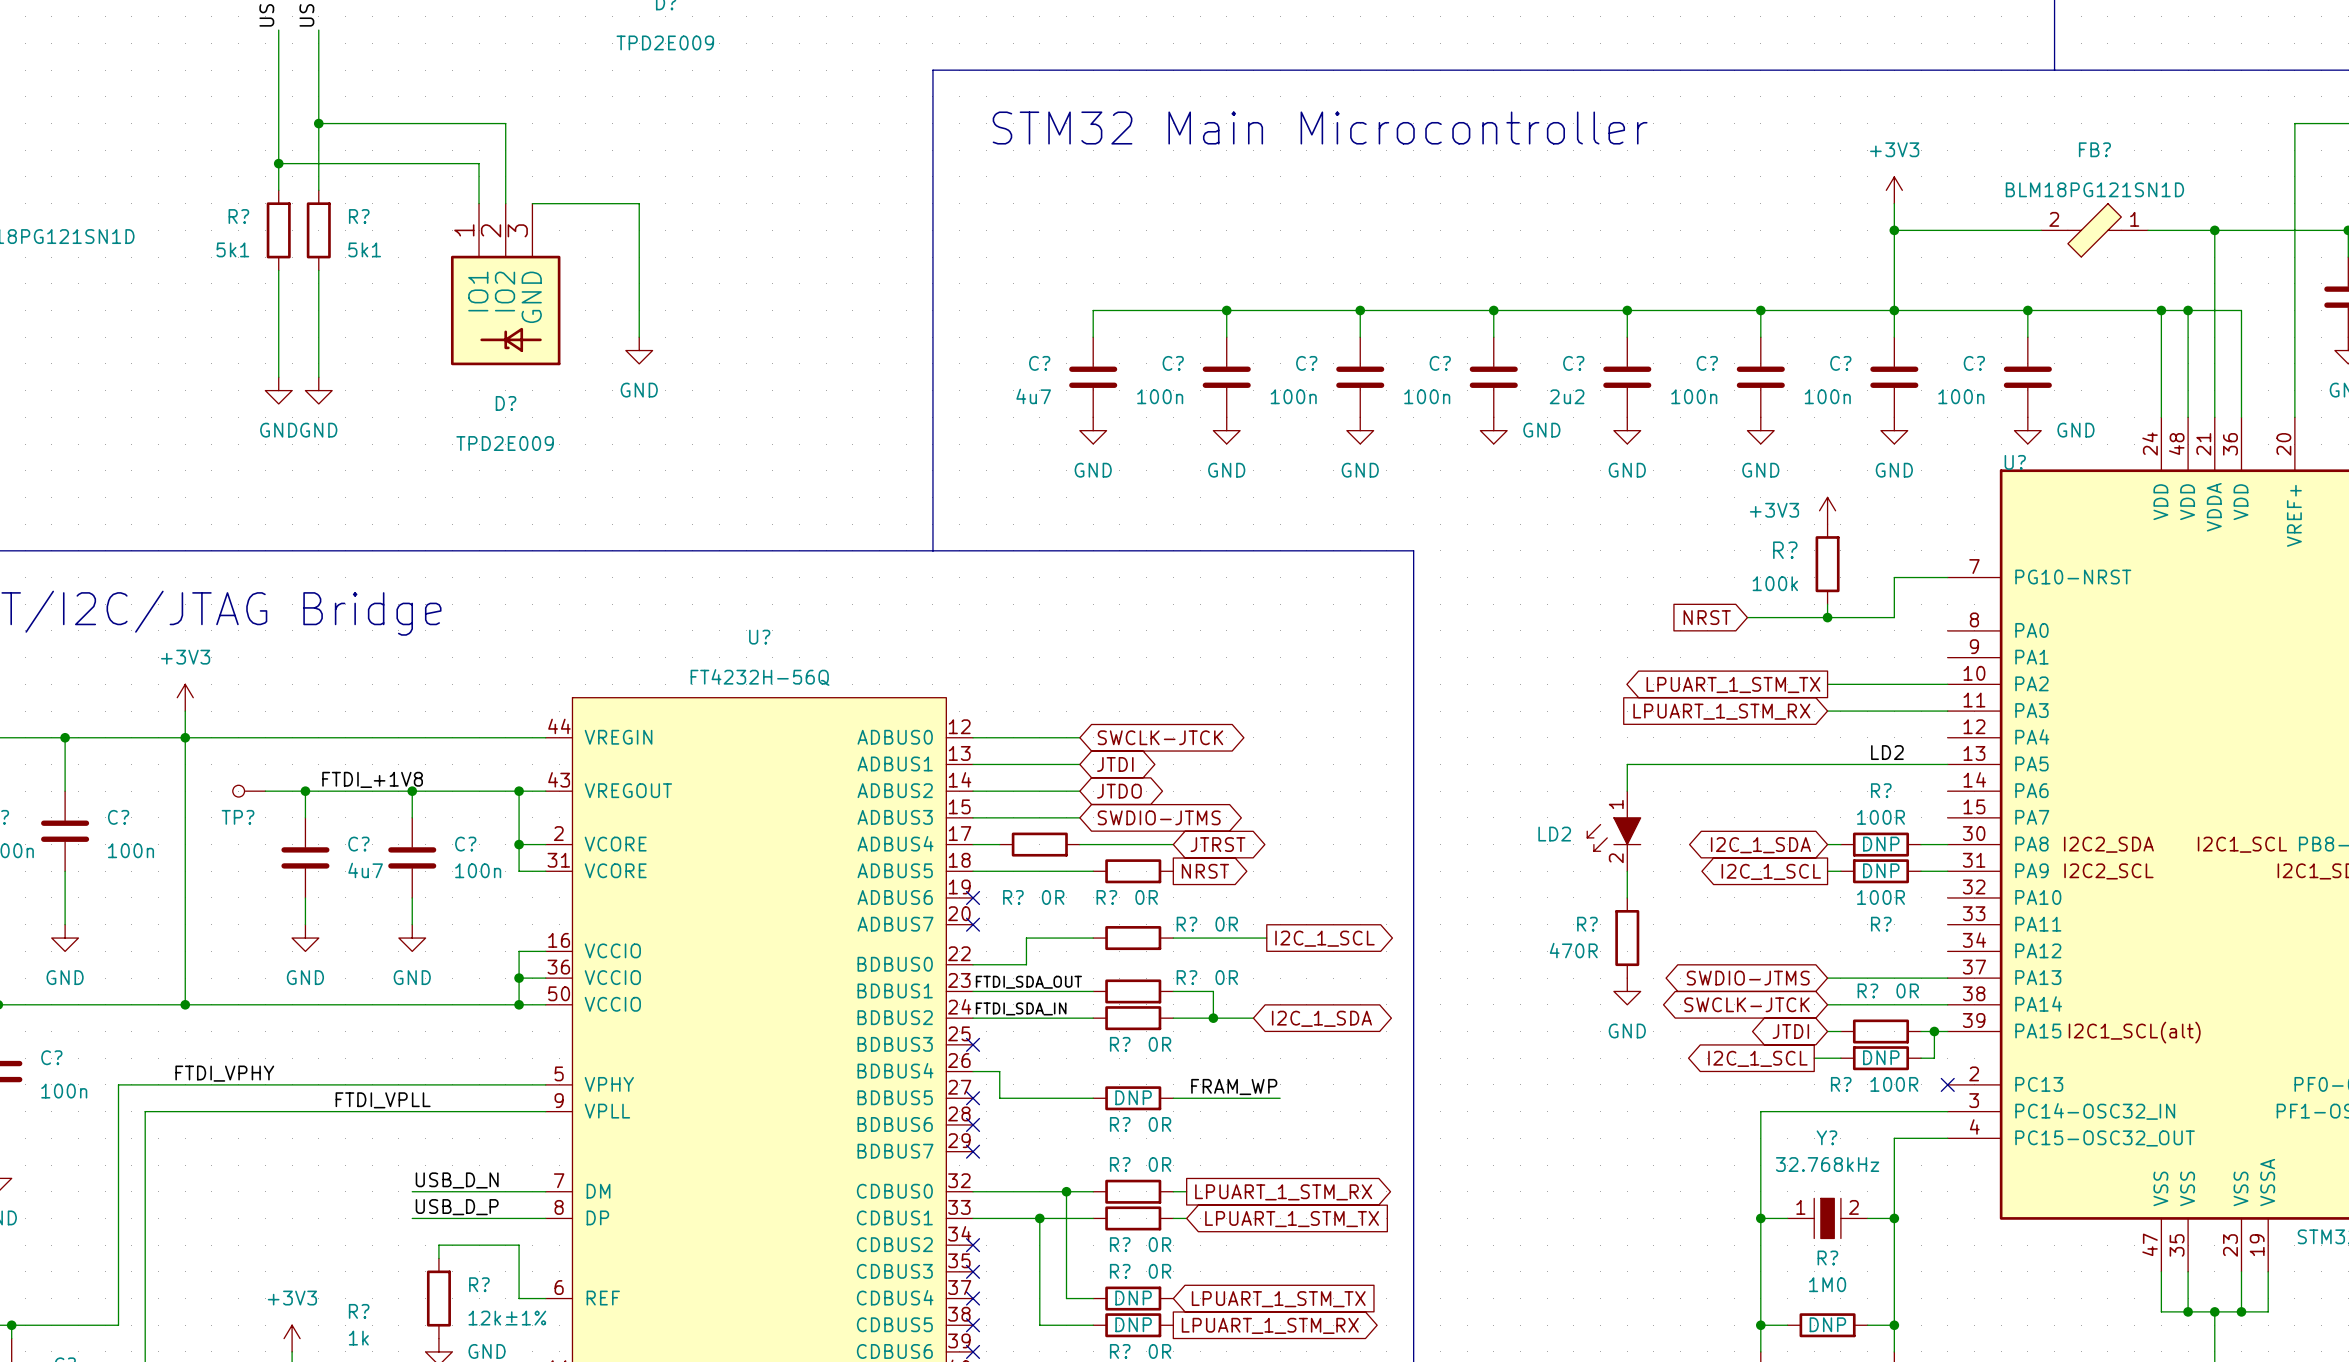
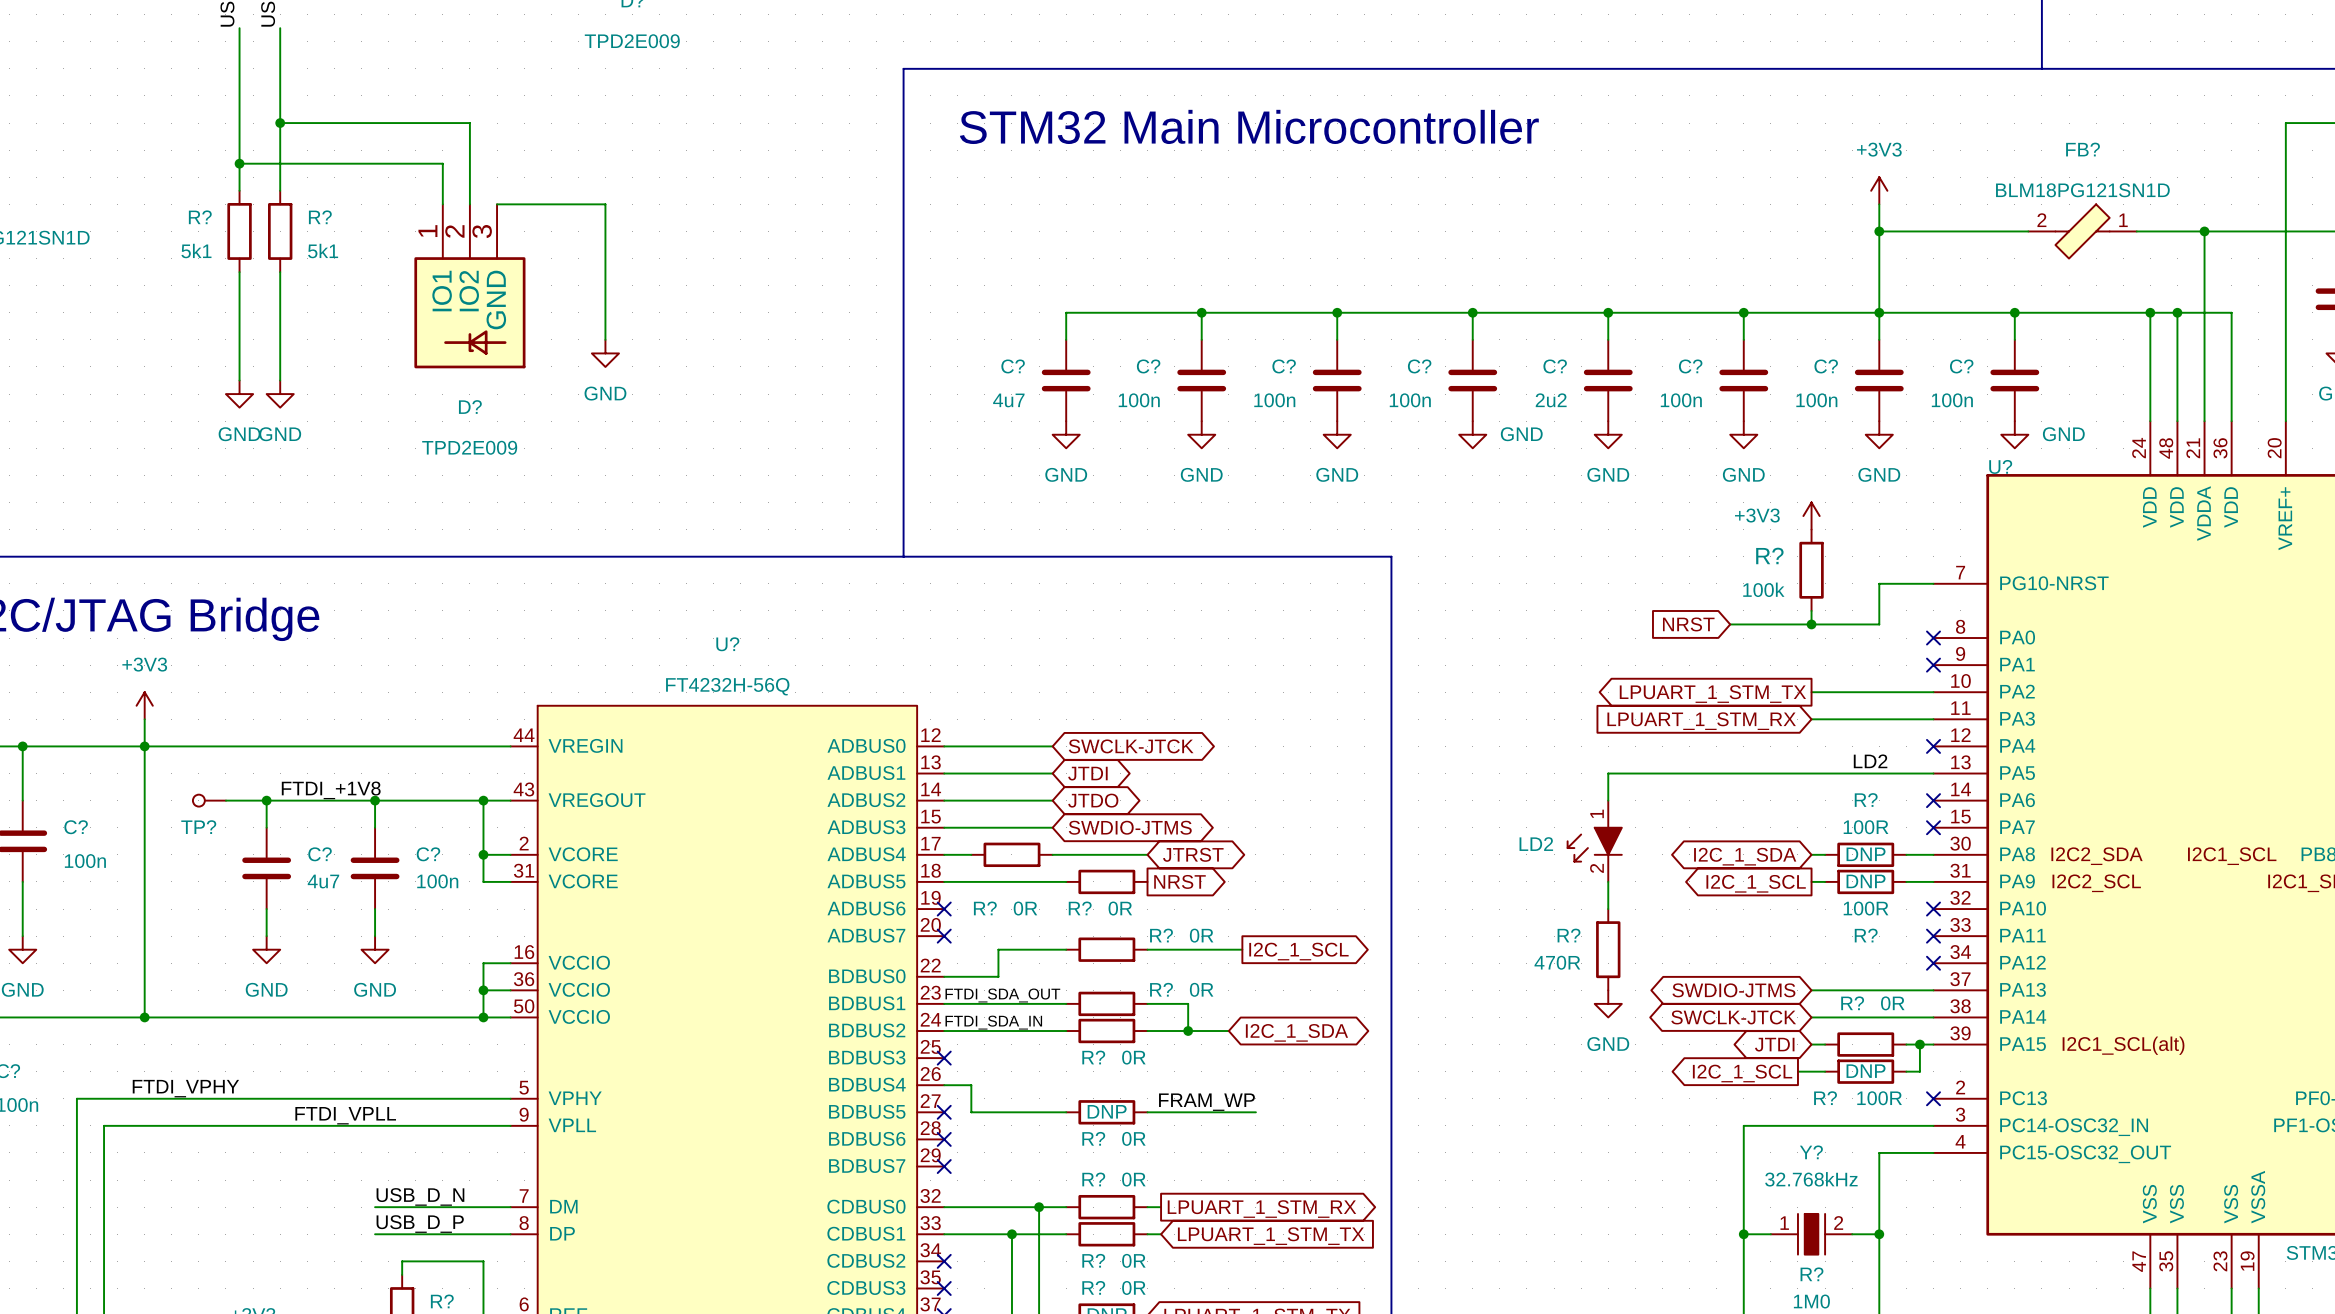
no-connect mark: none -> (1933, 638)
no-connect mark: none -> (1933, 665)
no-connect mark: none -> (1933, 746)
no-connect mark: none -> (1933, 800)
no-connect mark: none -> (1933, 827)
no-connect mark: none -> (1933, 909)
no-connect mark: none -> (1933, 936)
no-connect mark: none -> (1933, 963)

